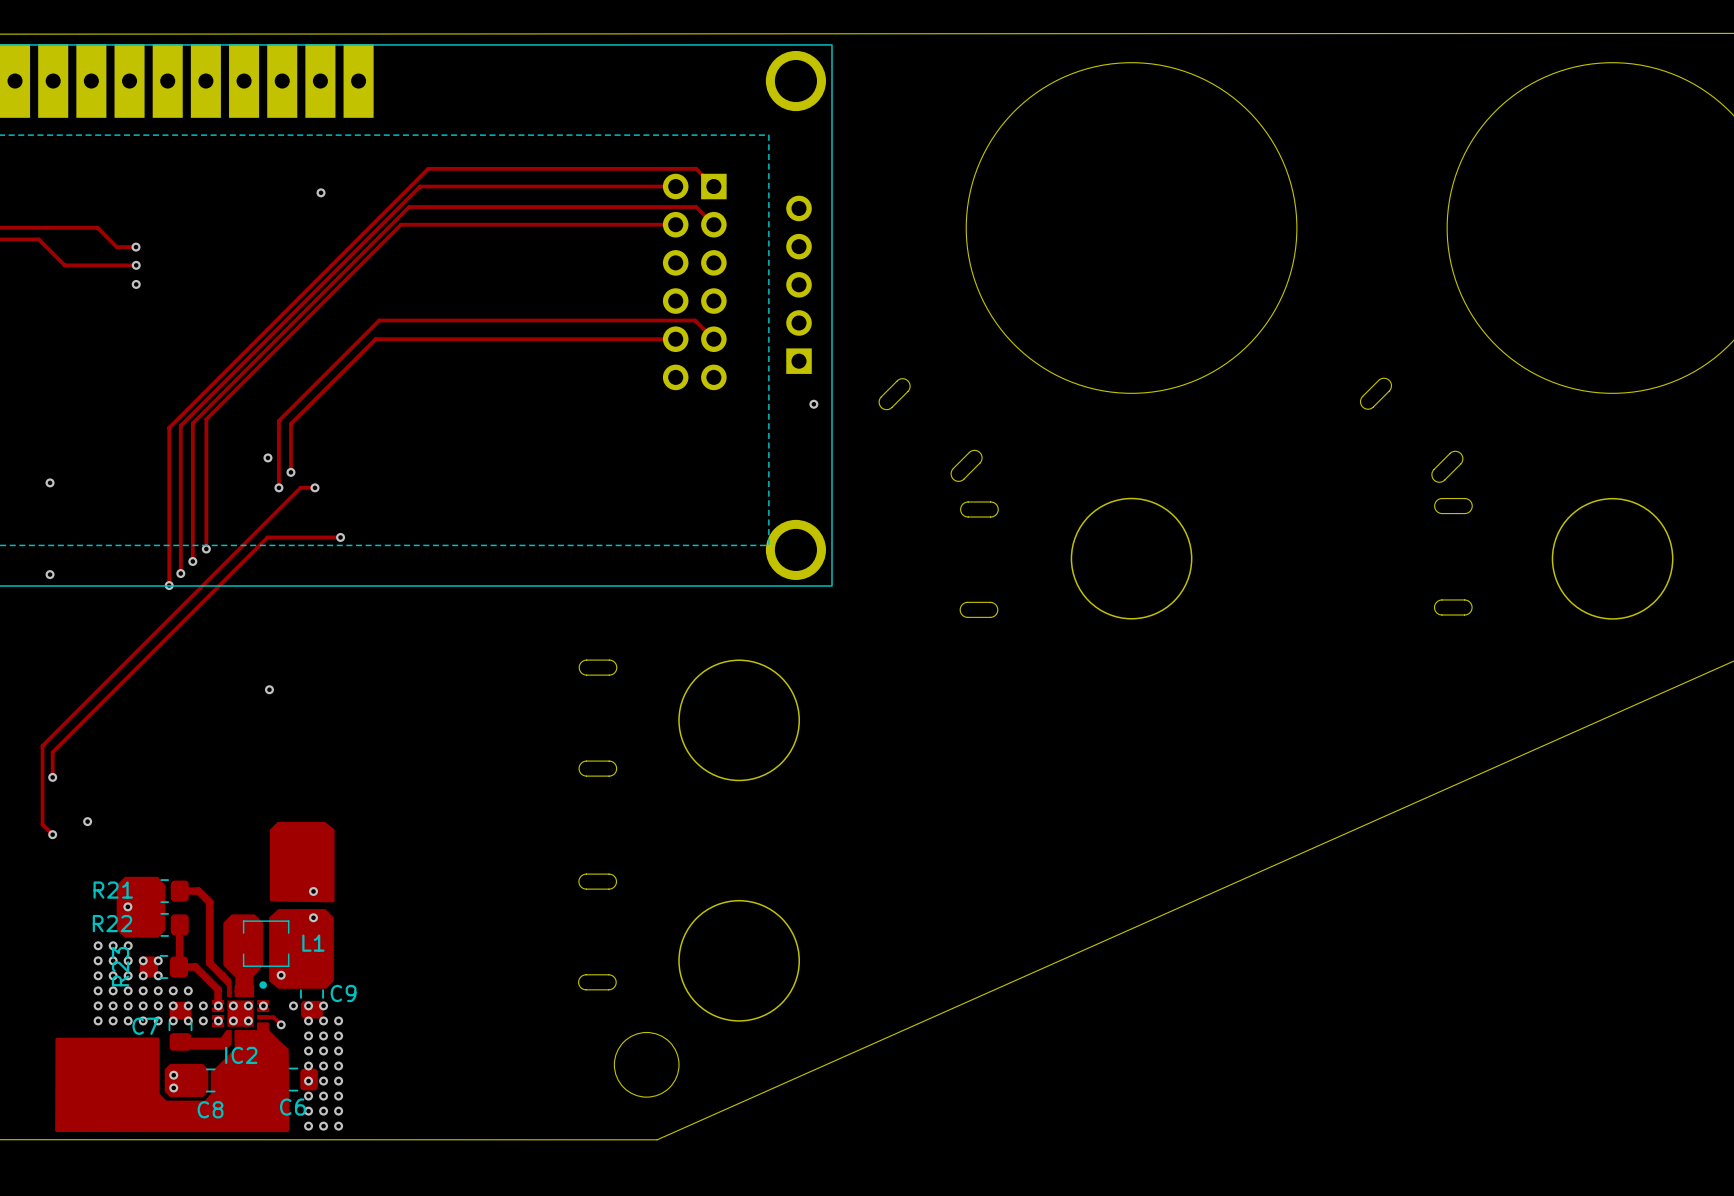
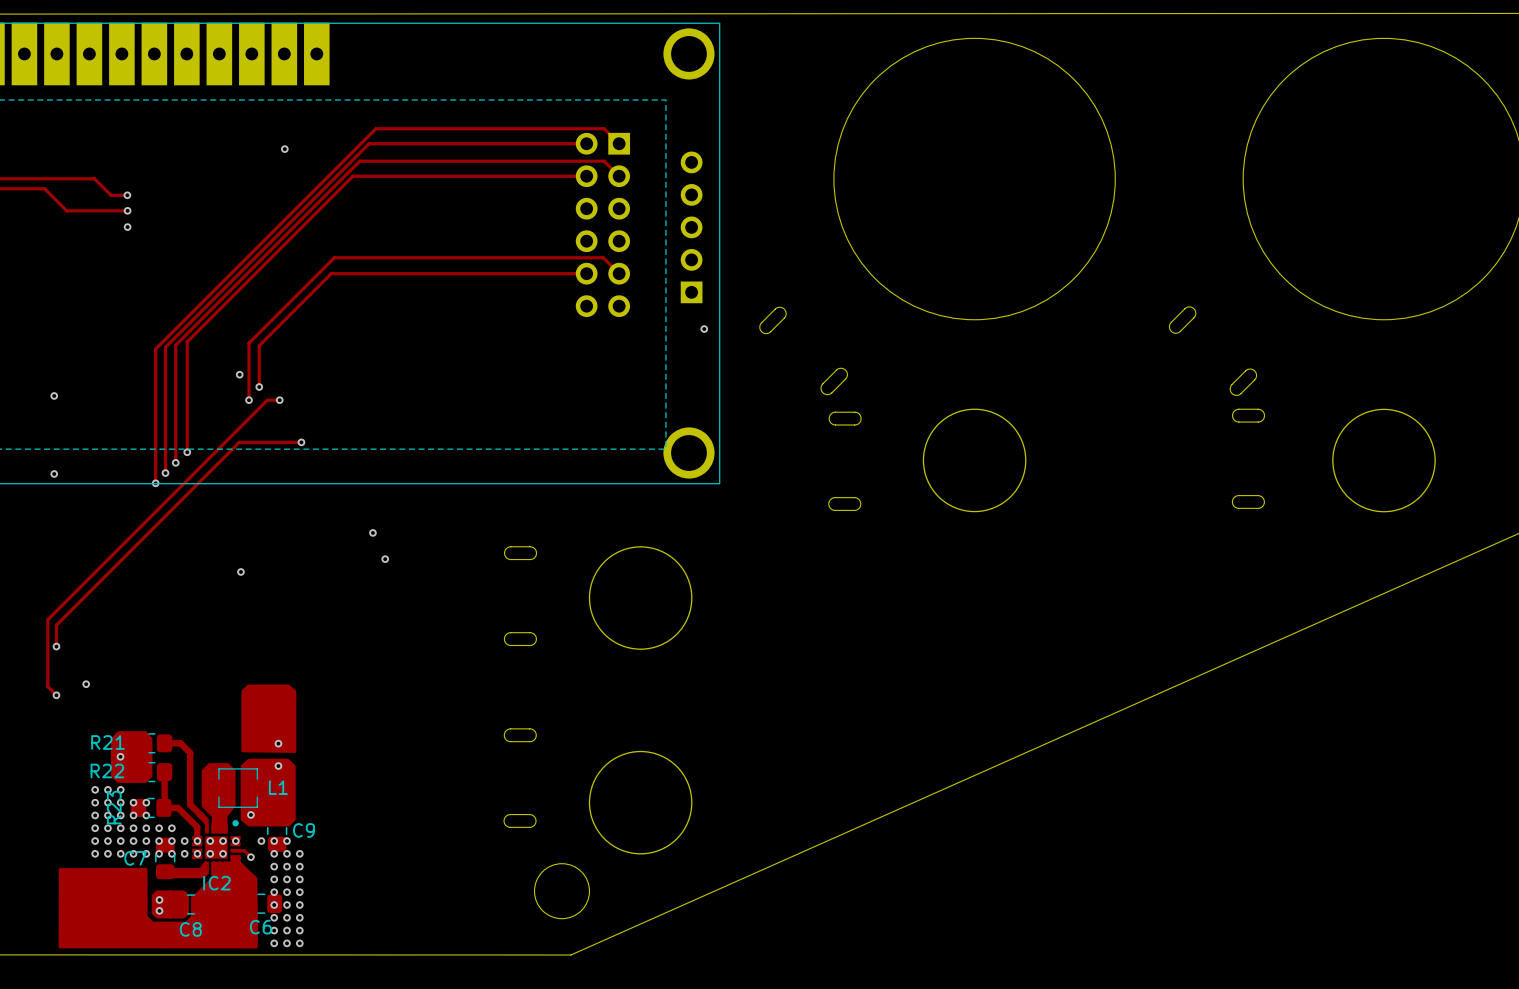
via: none -> (372, 532)
via: none -> (385, 559)

